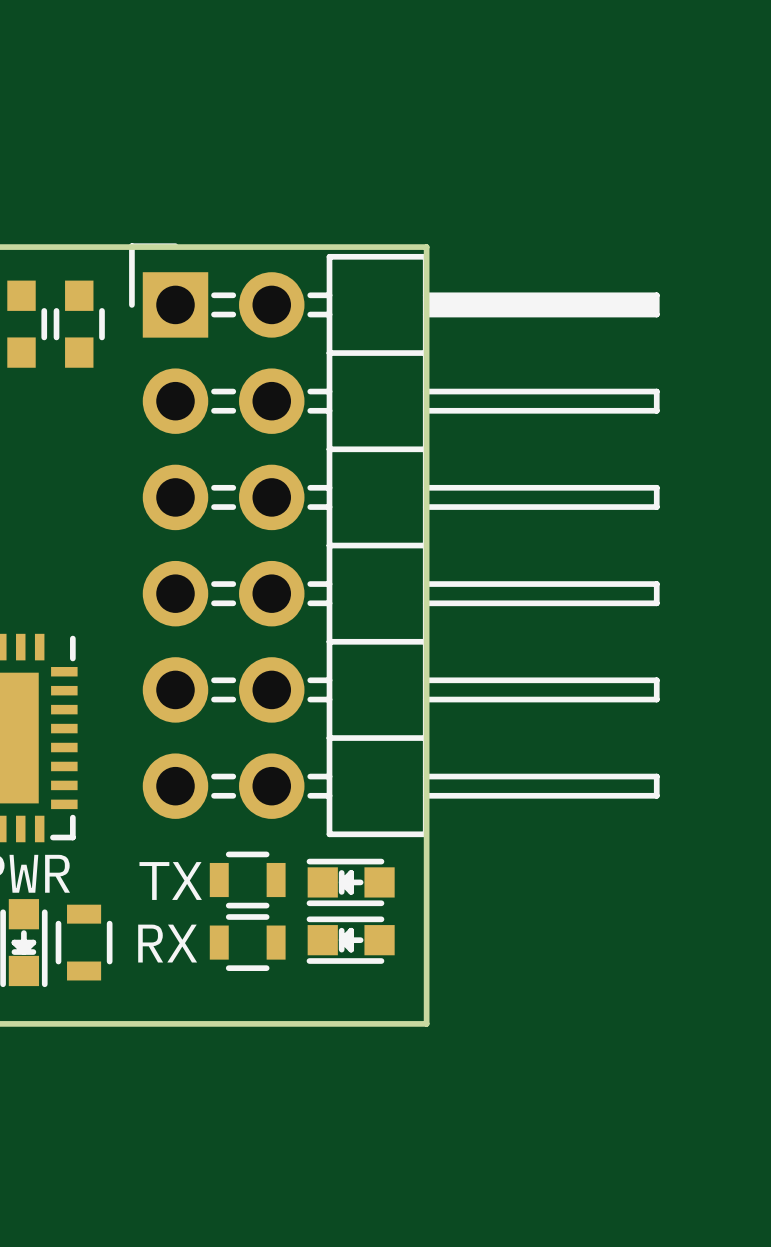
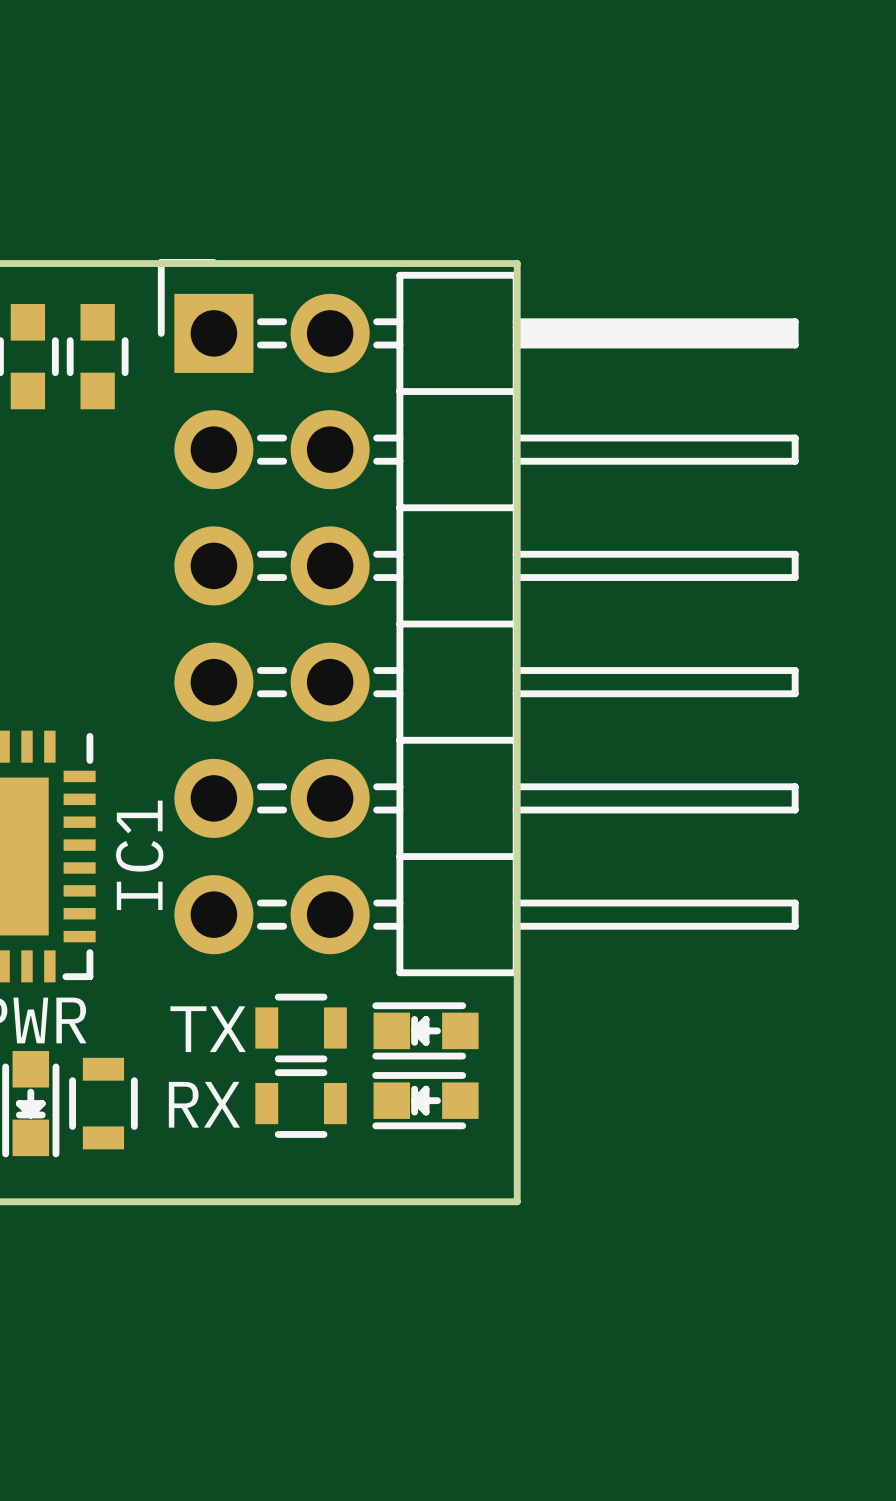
IC1 name: none -> IC1 (139, 855)

